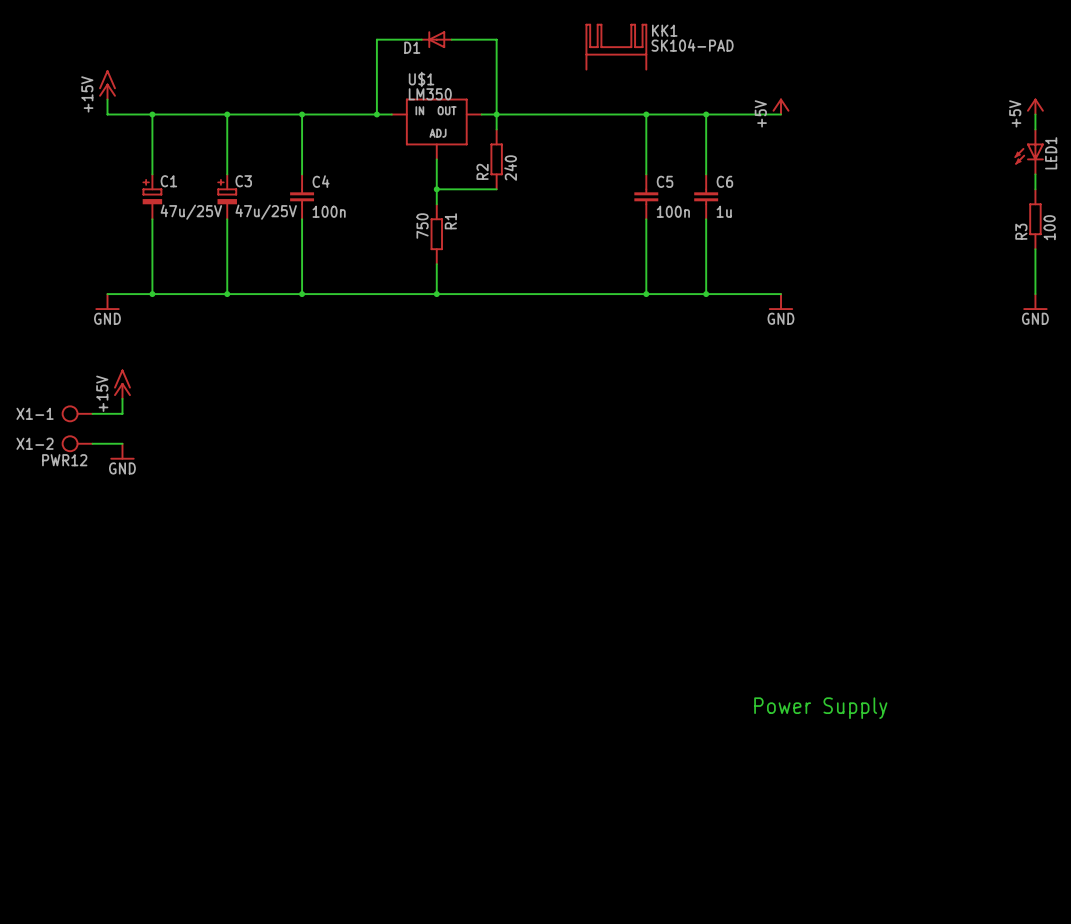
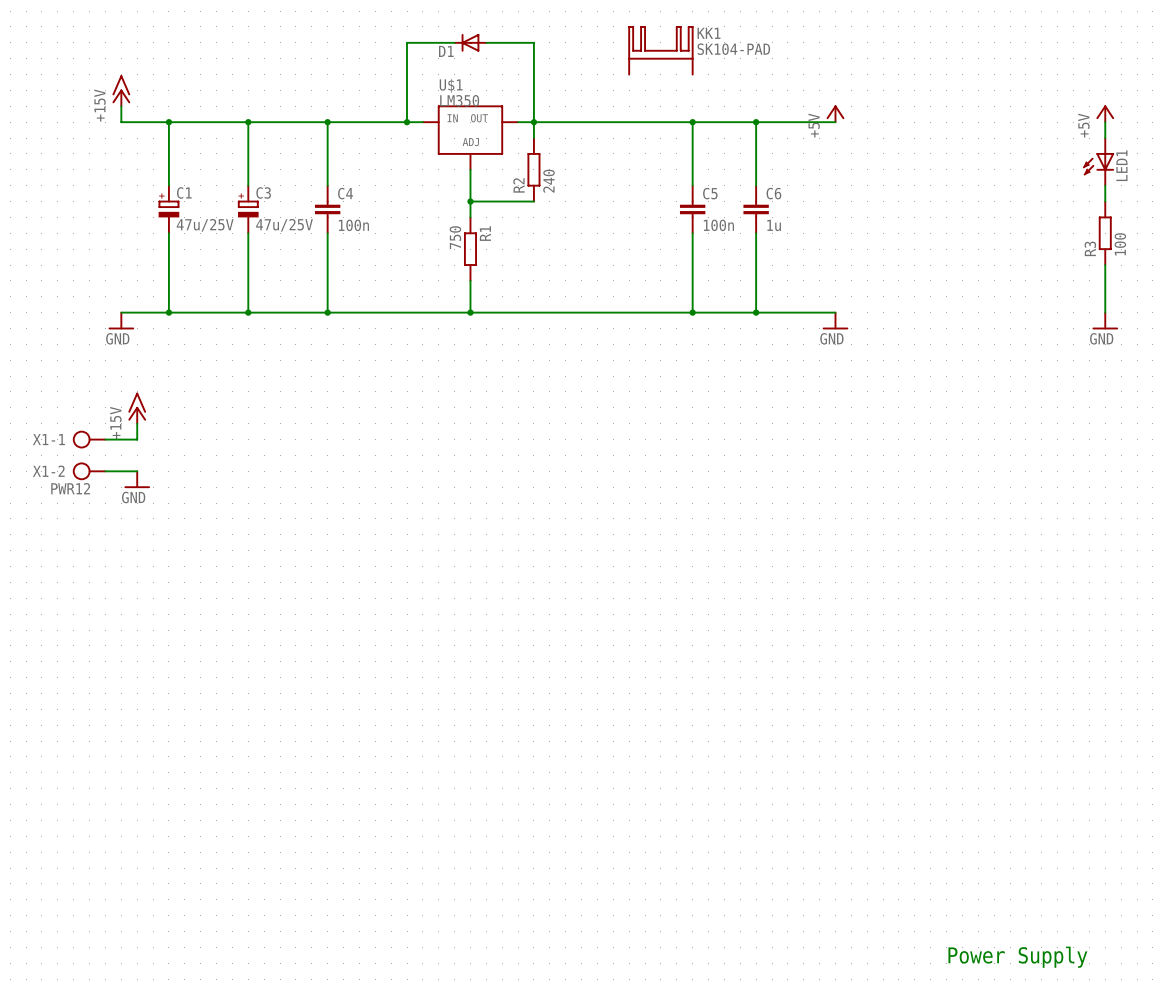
text: Power Supply (820, 708) -> none
text: none -> Power Supply (1017, 957)

